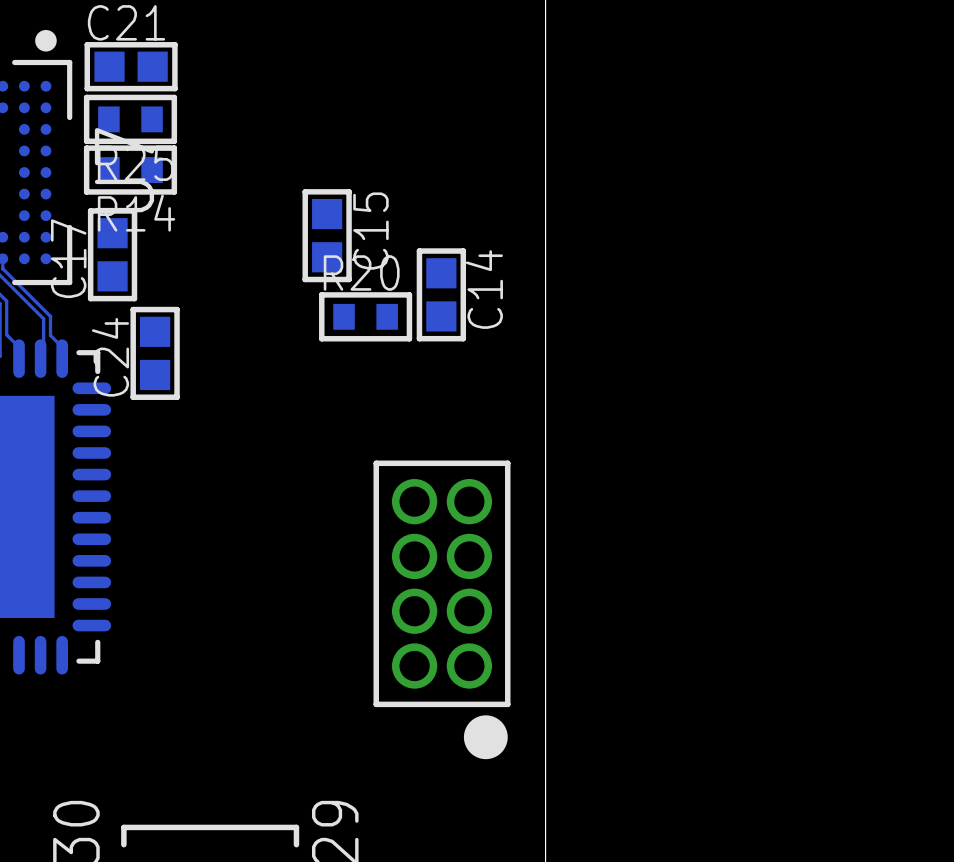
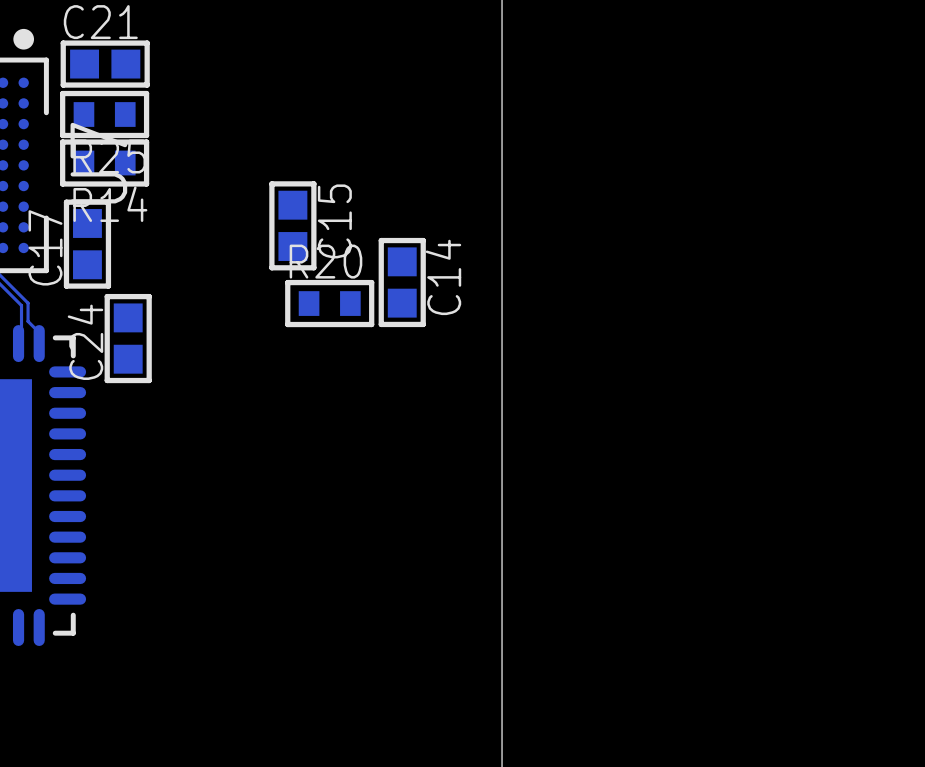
part: (442, 609) -> none

